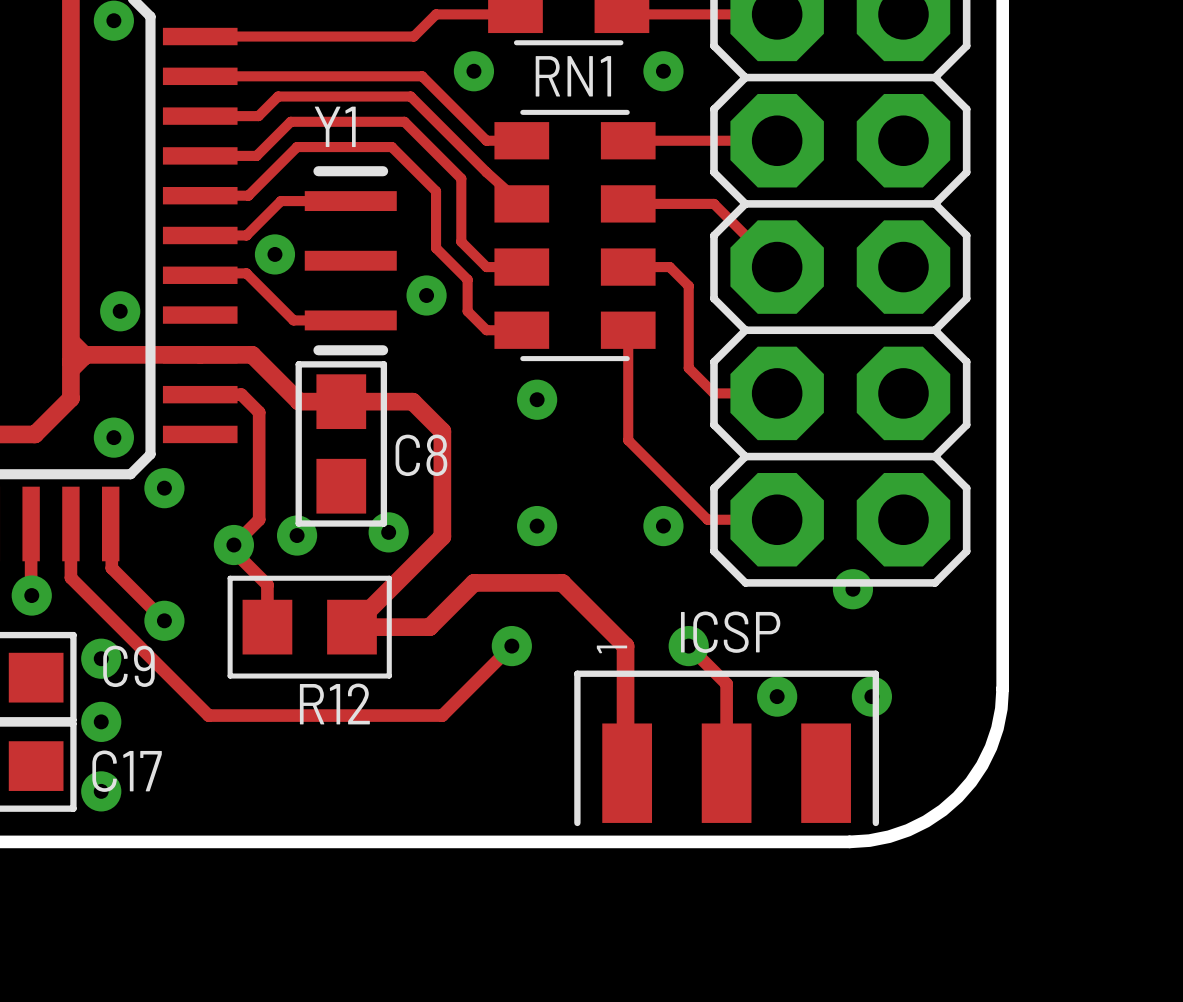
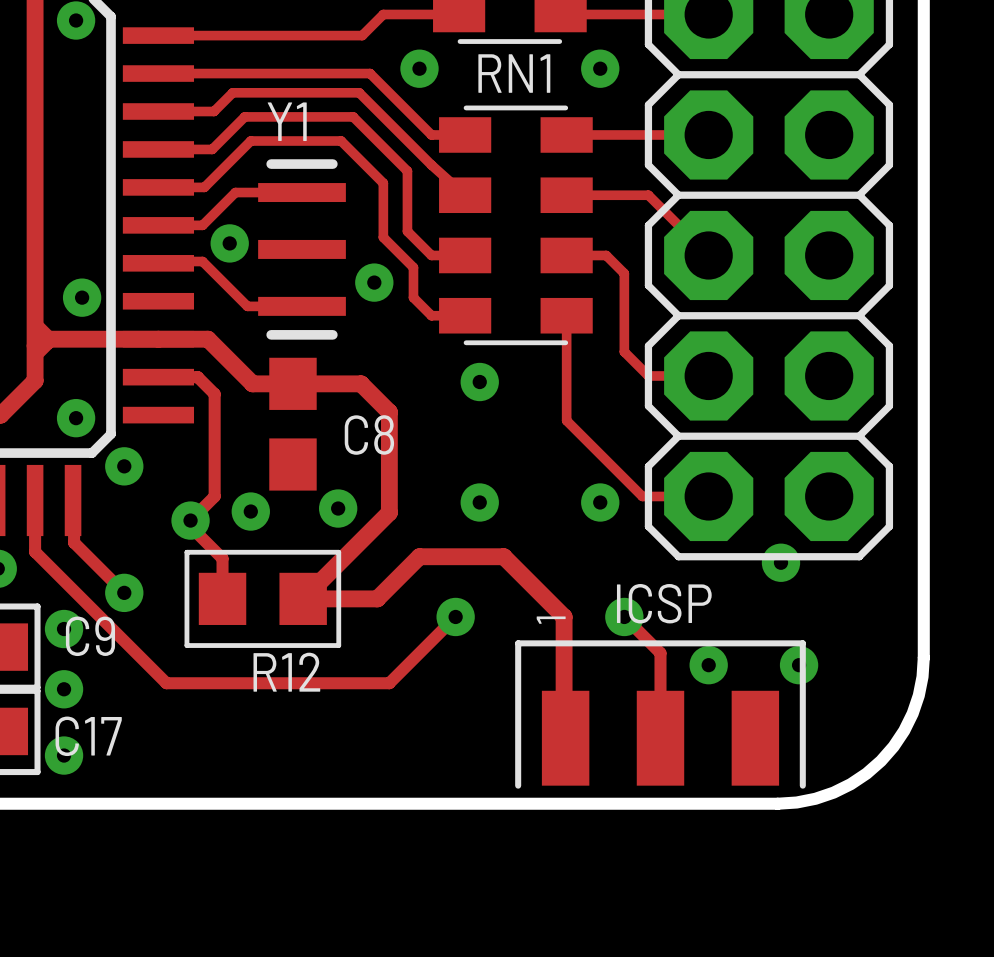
C8 footprint: [295, 361, 388, 527] -> [269, 357, 317, 491]

